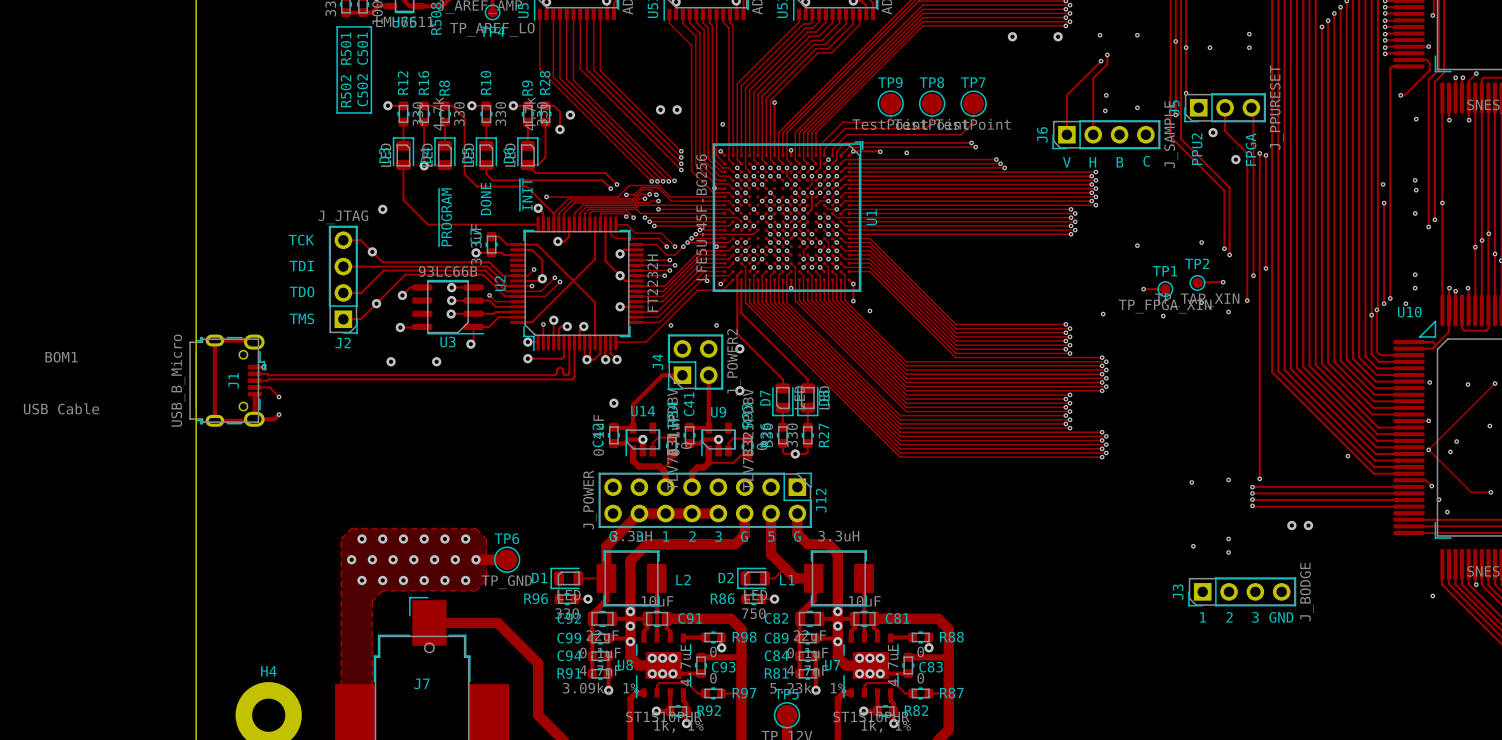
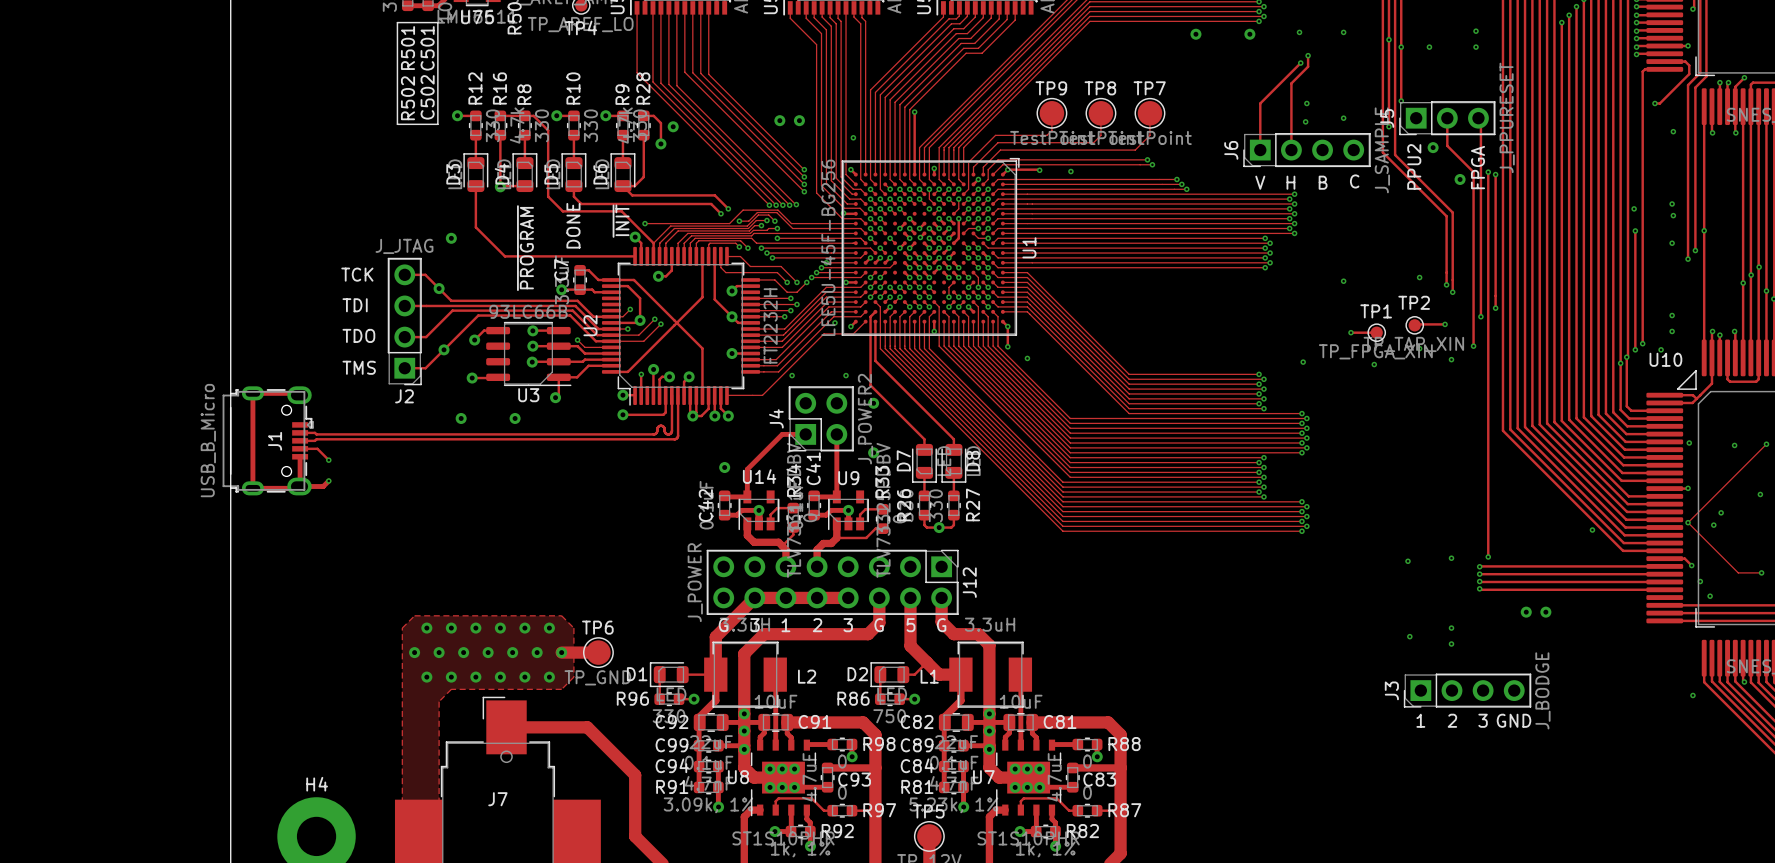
BOM1: USB Cable (61, 383) -> none

